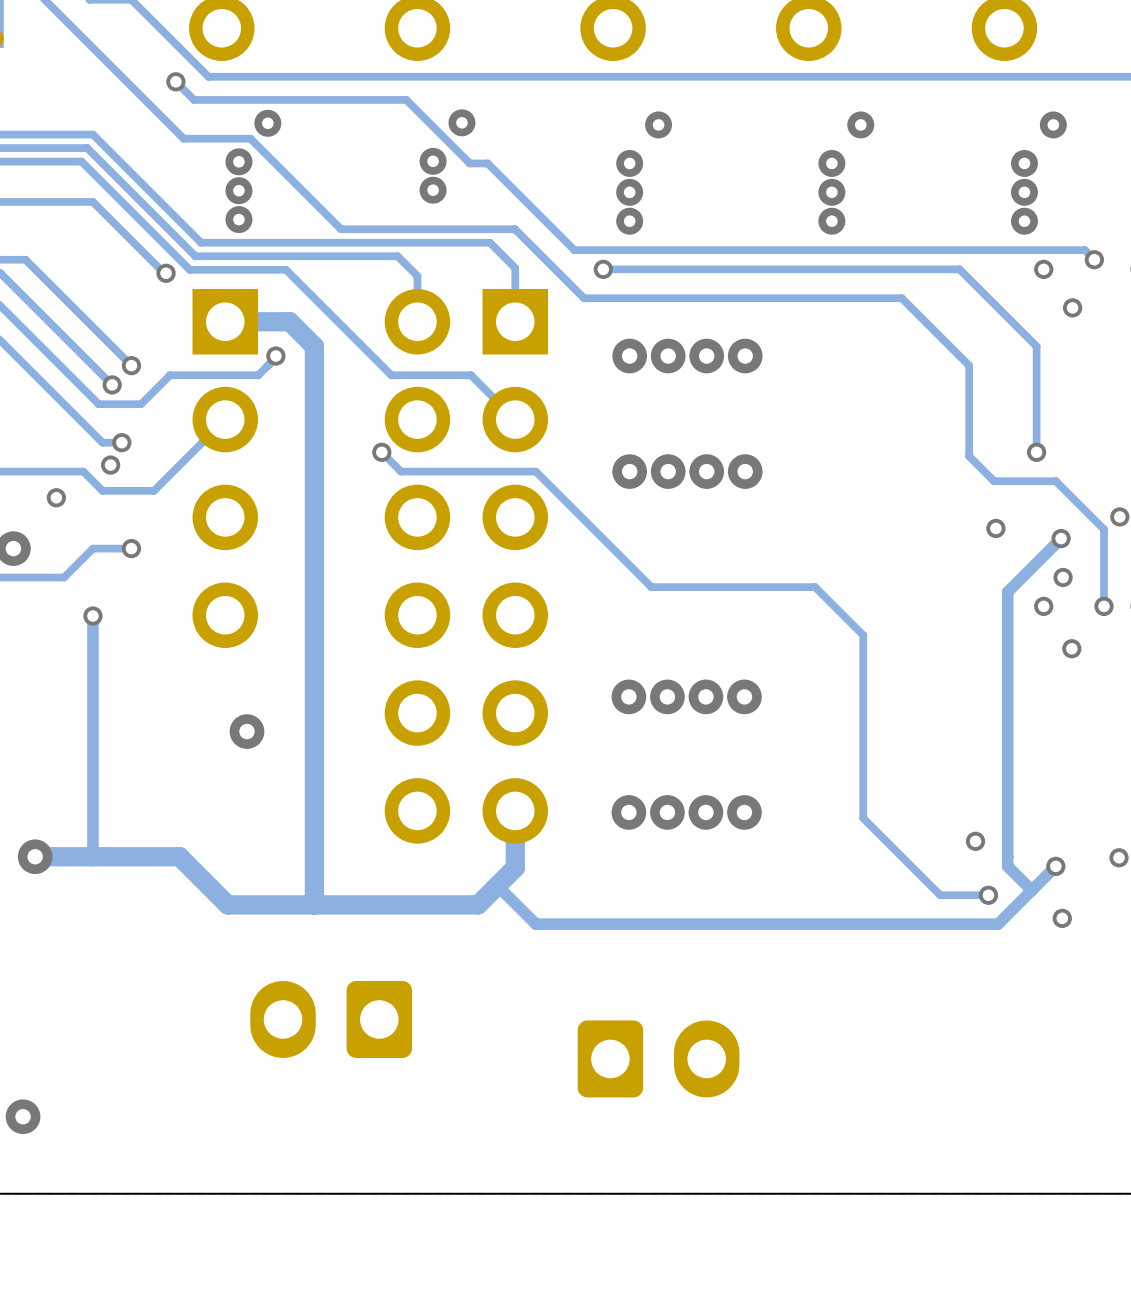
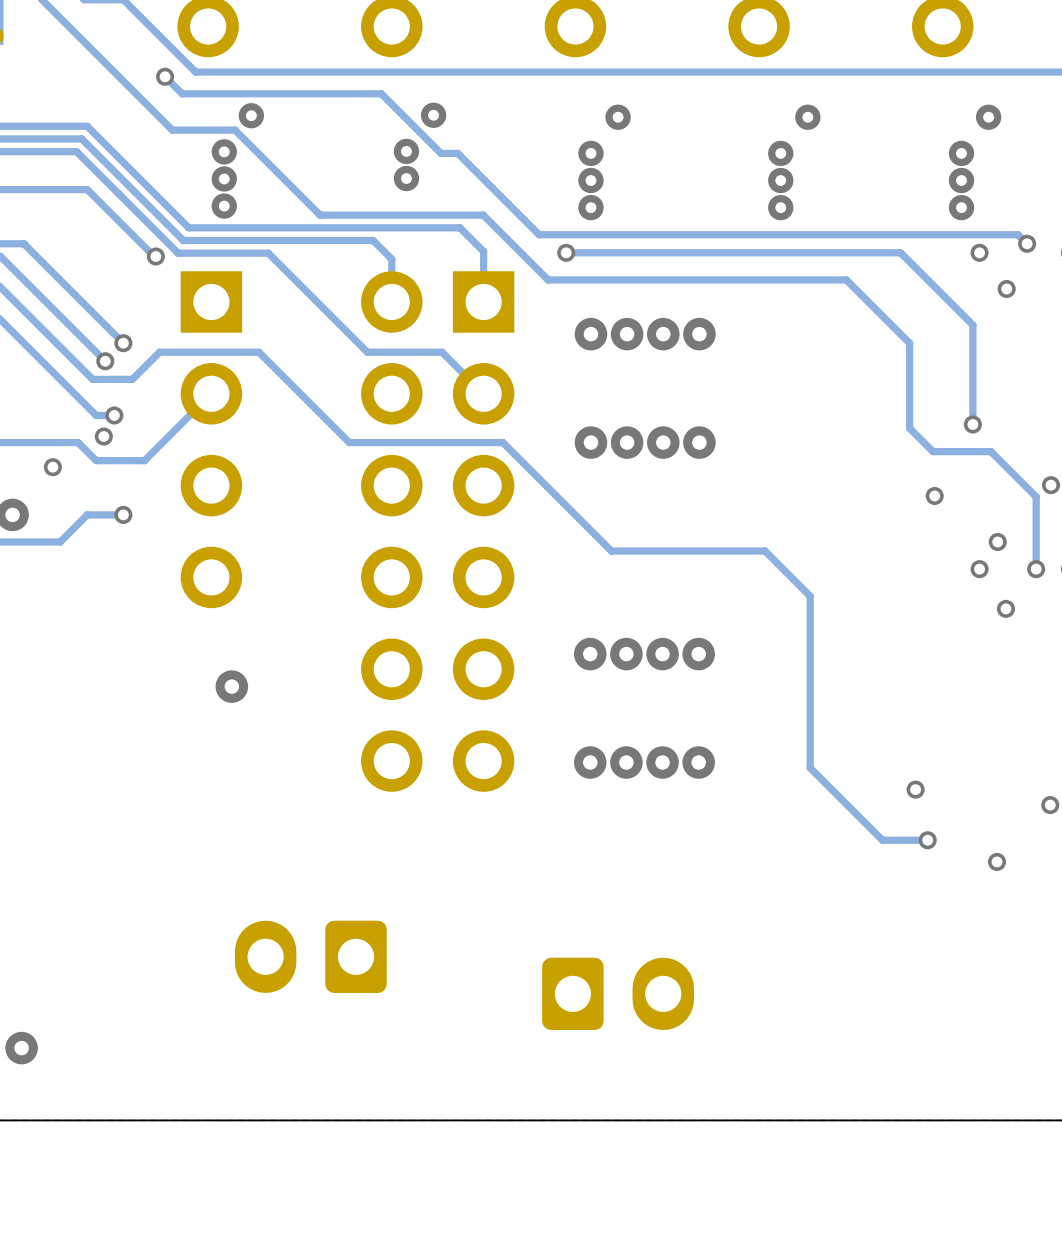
track: (225, 321) (289, 321) (314, 346) (314, 904) -> none
track: (275, 356) (258, 375) -> none
via: (275, 356) -> none
track: (381, 452) (401, 471) -> (242, 352) (258, 352) (349, 442) (376, 442)
via: (381, 452) -> none
track: (1061, 538) (1007, 591) (1007, 866) (1031, 890) -> none
via: (1061, 538) -> none
track: (92, 616) (92, 856) -> none
via: (92, 616) -> none
track: (515, 810) (515, 867) (478, 904) (227, 904) (179, 856) (35, 856) -> none
via: (35, 856) -> none
track: (1055, 866) (998, 924) (535, 924) (497, 885) -> none
via: (1055, 866) -> none

